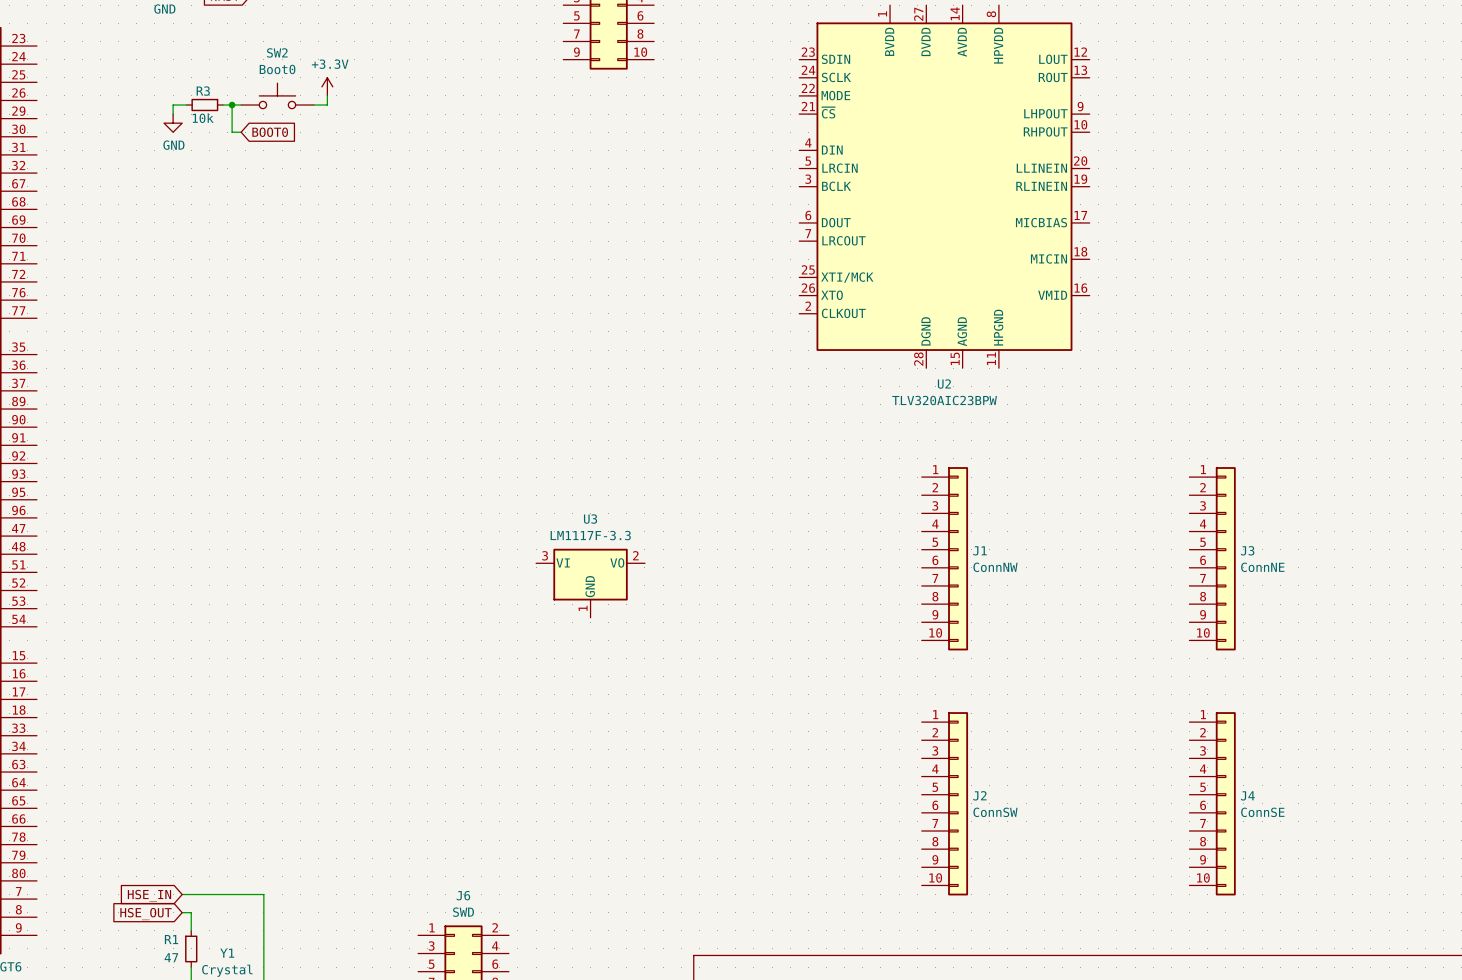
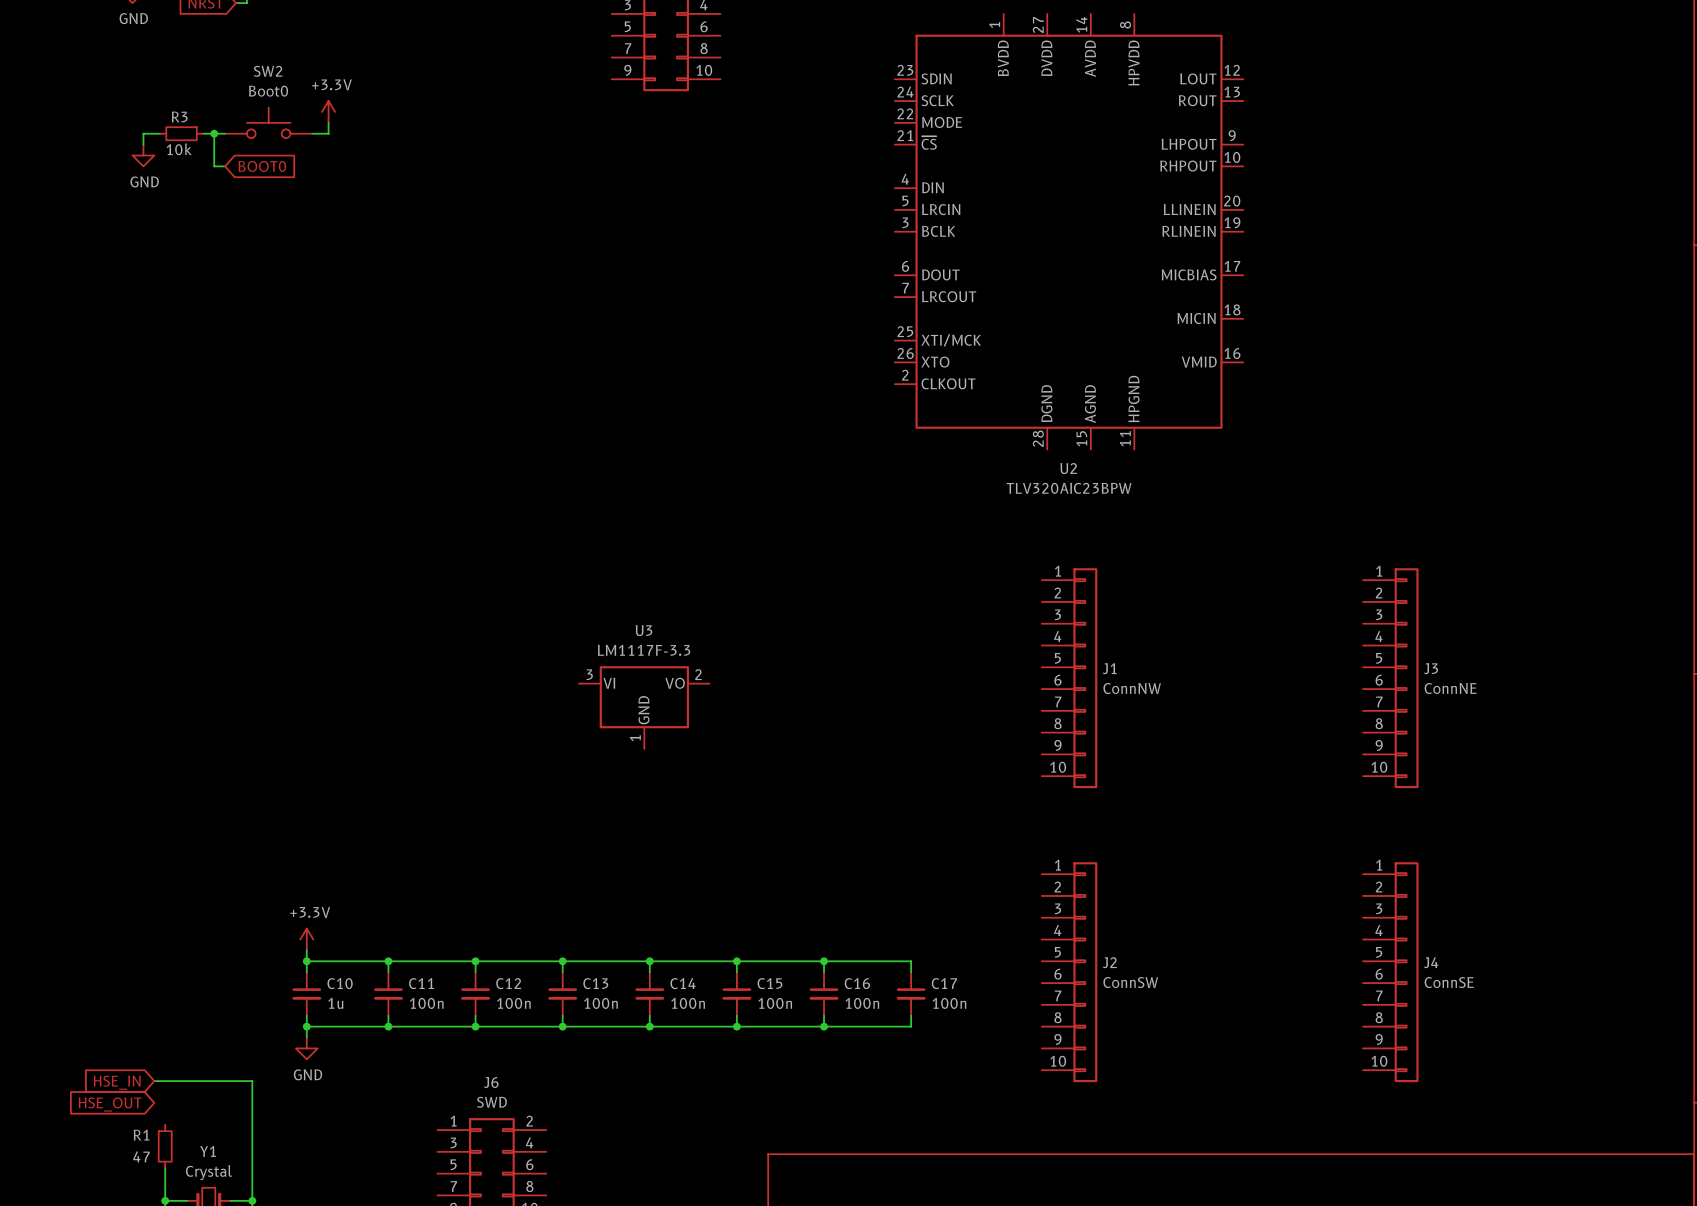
power symbol: none -> +3.3V (306, 939)
wire: none -> (306, 950) (306, 972)
wire: none -> (306, 961) (911, 961) (911, 972)
junction: none -> (306, 961)
wire: none -> (388, 961) (388, 972)
junction: none -> (388, 961)
wire: none -> (475, 961) (475, 972)
junction: none -> (475, 961)
wire: none -> (562, 961) (562, 972)
junction: none -> (562, 961)
wire: none -> (649, 961) (649, 972)
junction: none -> (649, 961)
wire: none -> (736, 961) (736, 972)
junction: none -> (736, 961)
wire: none -> (824, 961) (824, 972)
junction: none -> (824, 961)
C10: none -> 1u (306, 993)
C11: none -> 100n (388, 993)
C12: none -> 100n (475, 993)
C13: none -> 100n (562, 993)
C14: none -> 100n (649, 993)
C15: none -> 100n (736, 993)
C16: none -> 100n (824, 993)
C17: none -> 100n (911, 993)
wire: none -> (306, 1015) (306, 1037)
wire: none -> (388, 1015) (388, 1026)
wire: none -> (475, 1015) (475, 1026)
wire: none -> (562, 1015) (562, 1026)
wire: none -> (649, 1015) (649, 1026)
wire: none -> (736, 1015) (736, 1026)
wire: none -> (824, 1015) (824, 1026)
wire: none -> (911, 1015) (911, 1026) (306, 1026)
junction: none -> (306, 1026)
junction: none -> (388, 1026)
junction: none -> (475, 1026)
junction: none -> (562, 1026)
junction: none -> (649, 1026)
junction: none -> (736, 1026)
junction: none -> (824, 1026)
power symbol: none -> GND (306, 1048)
wire: (182, 912) (191, 912) (191, 930) -> none

